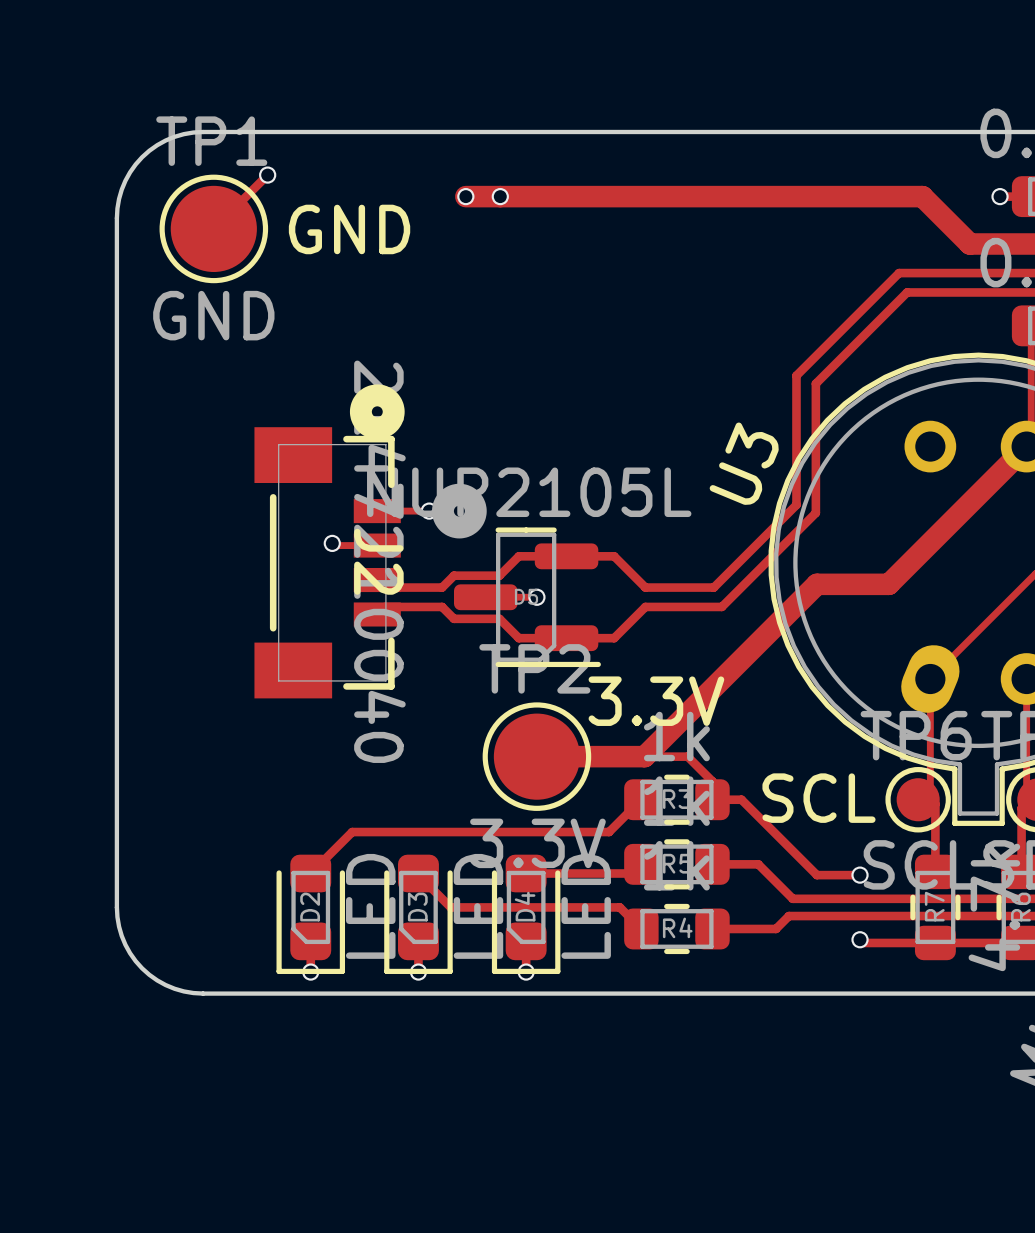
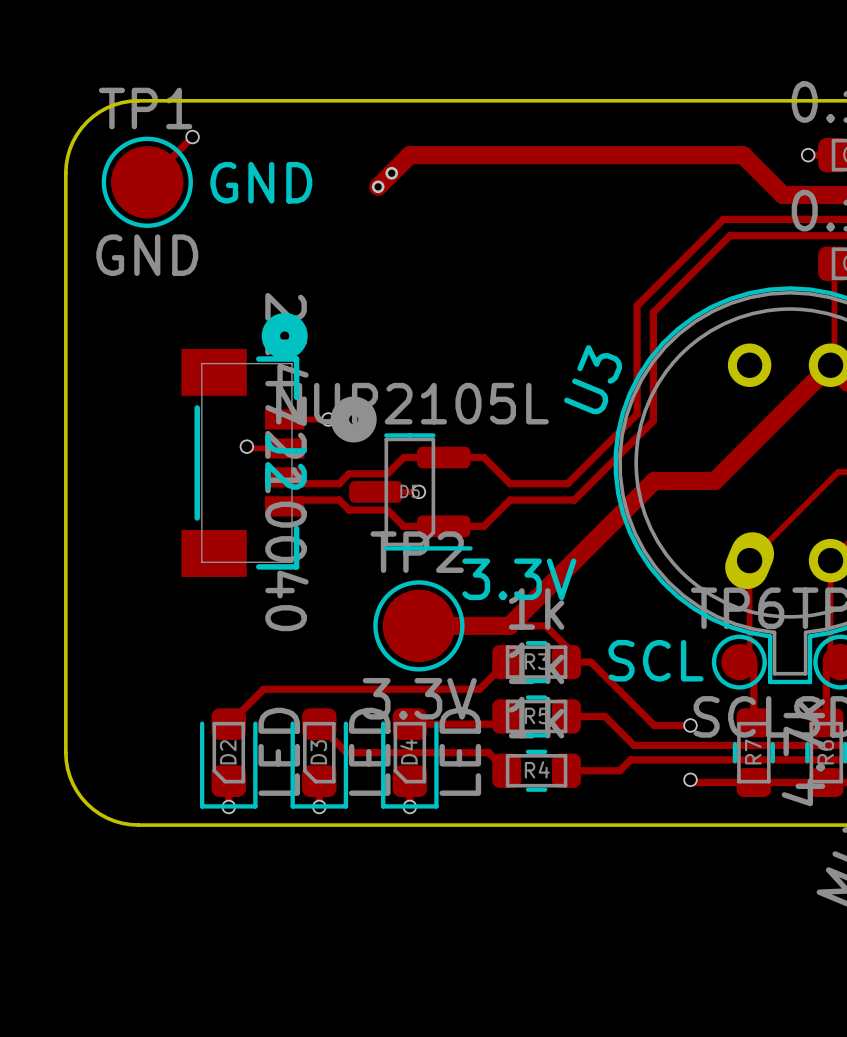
track: (465, 196) (526, 196) -> (378, 186) (409, 155)
via: (465, 196) -> none
via: (500, 196) -> none
via: none -> (391, 173)
via: none -> (378, 186)

